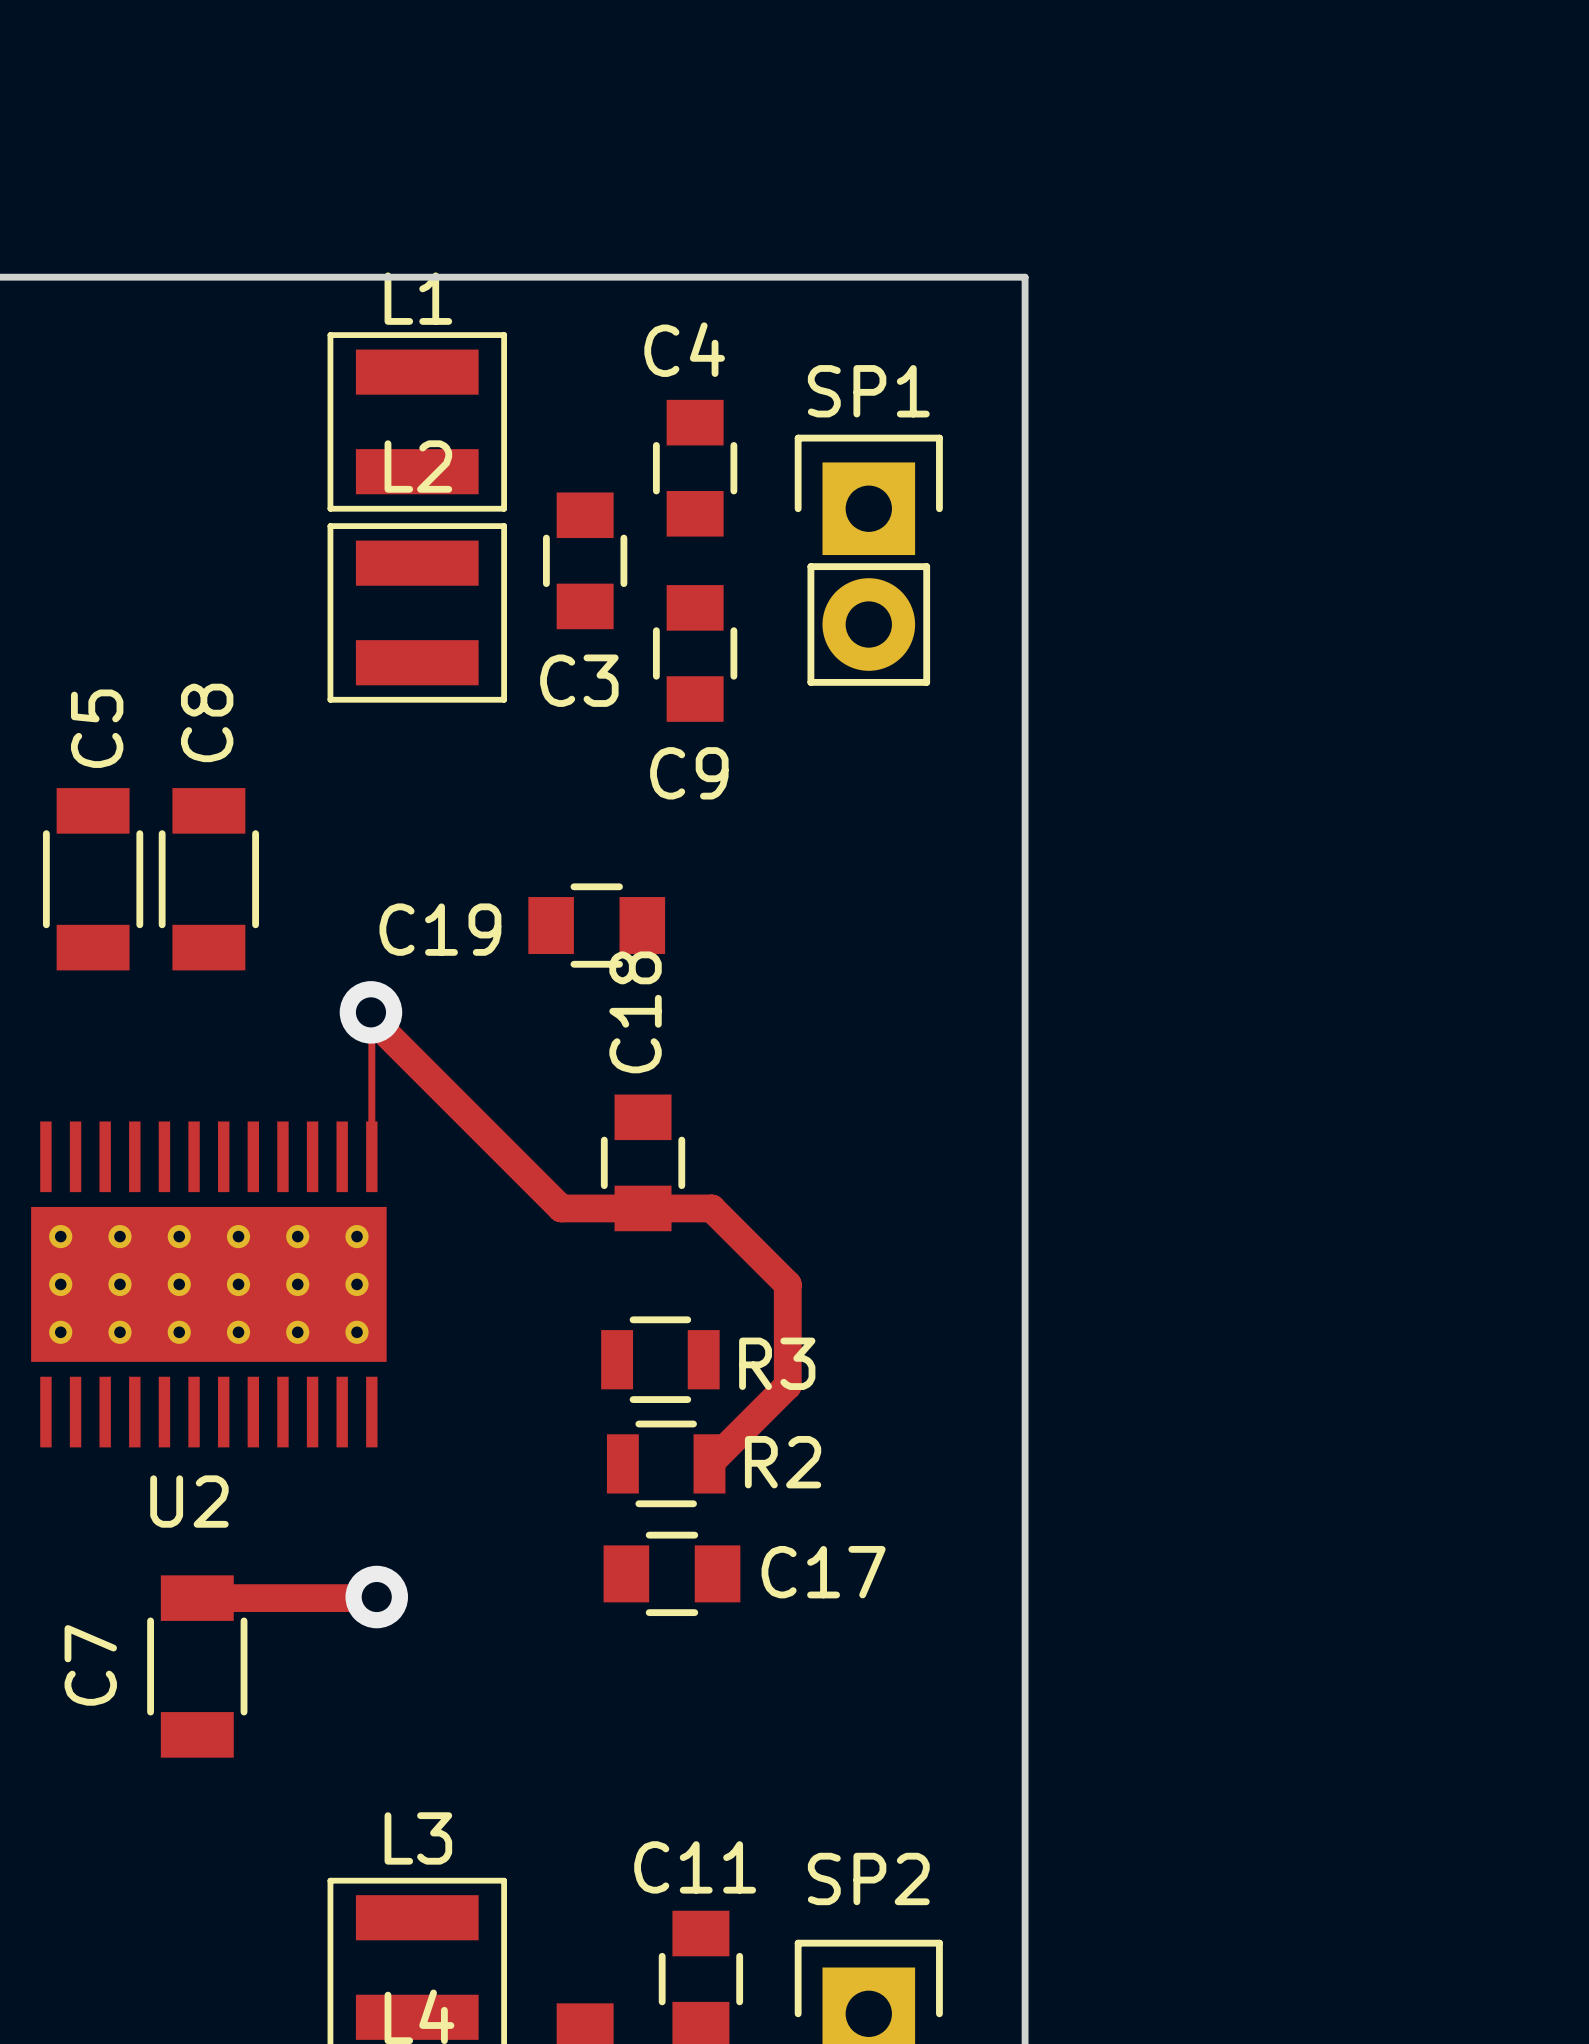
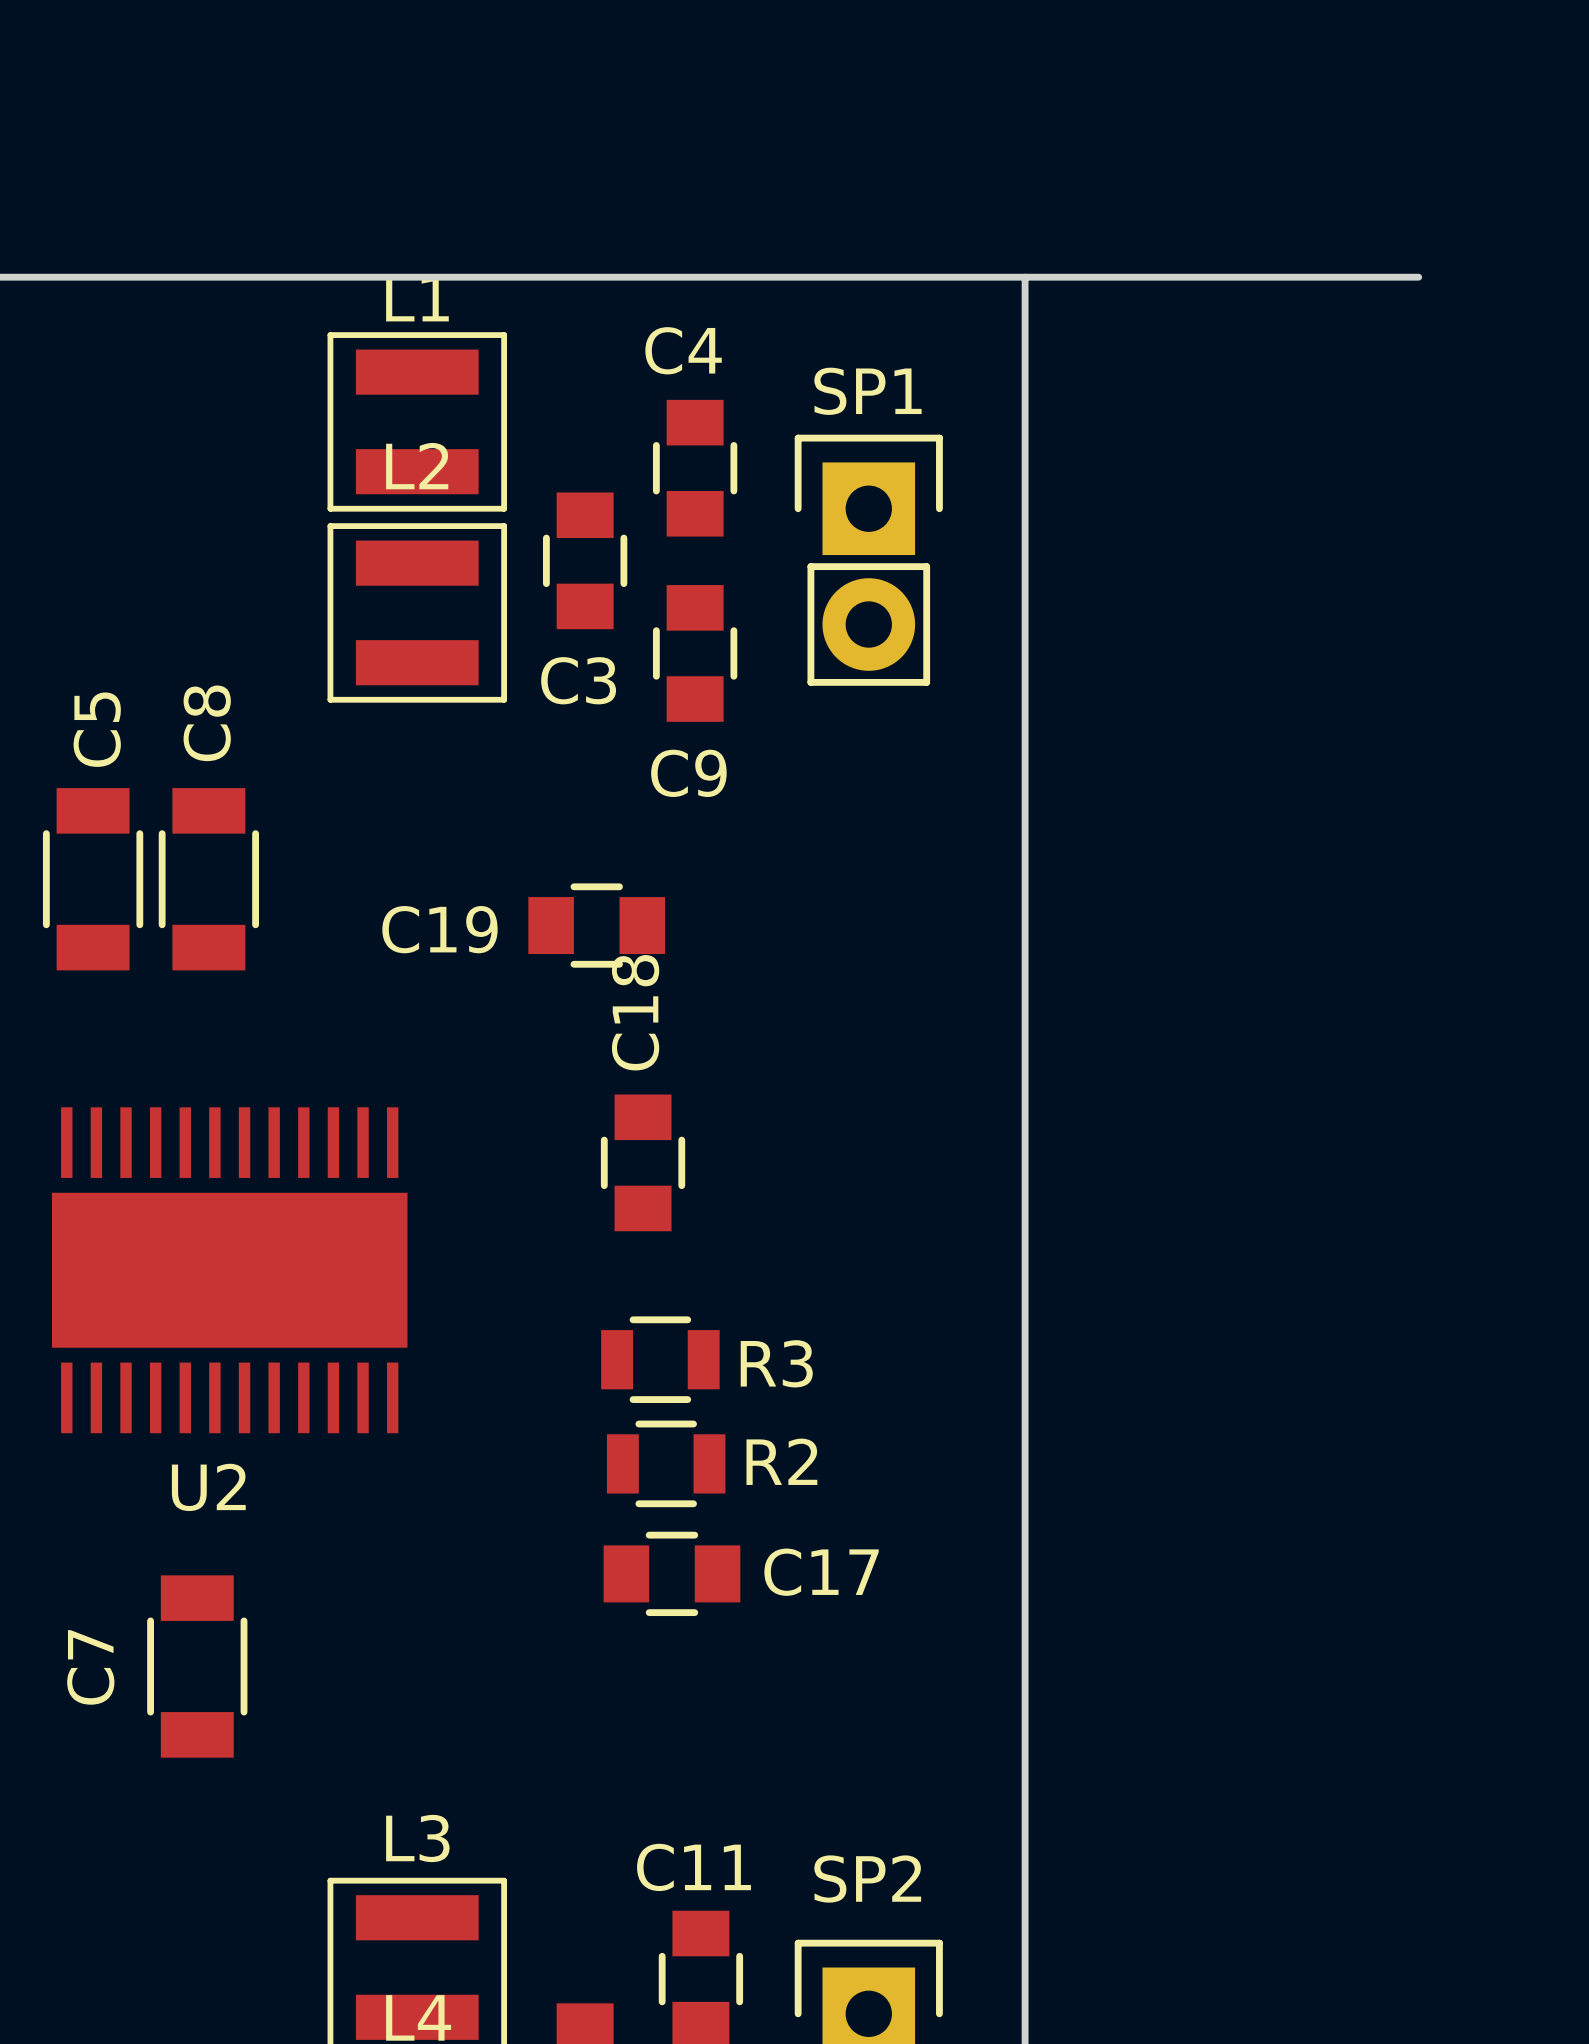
board edge: none -> (1025, 277) (1418, 277)
track: (370, 1012) (371, 1156) -> none
via: (370, 1012) -> none
track: (370, 1018) (561, 1208) (711, 1208) (787, 1284) (787, 1385) (709, 1463) -> none
U2 footprint: [31, 1121, 387, 1448] -> [51, 1107, 408, 1434]
track: (376, 1597) (197, 1598) -> none
via: (376, 1597) -> none

